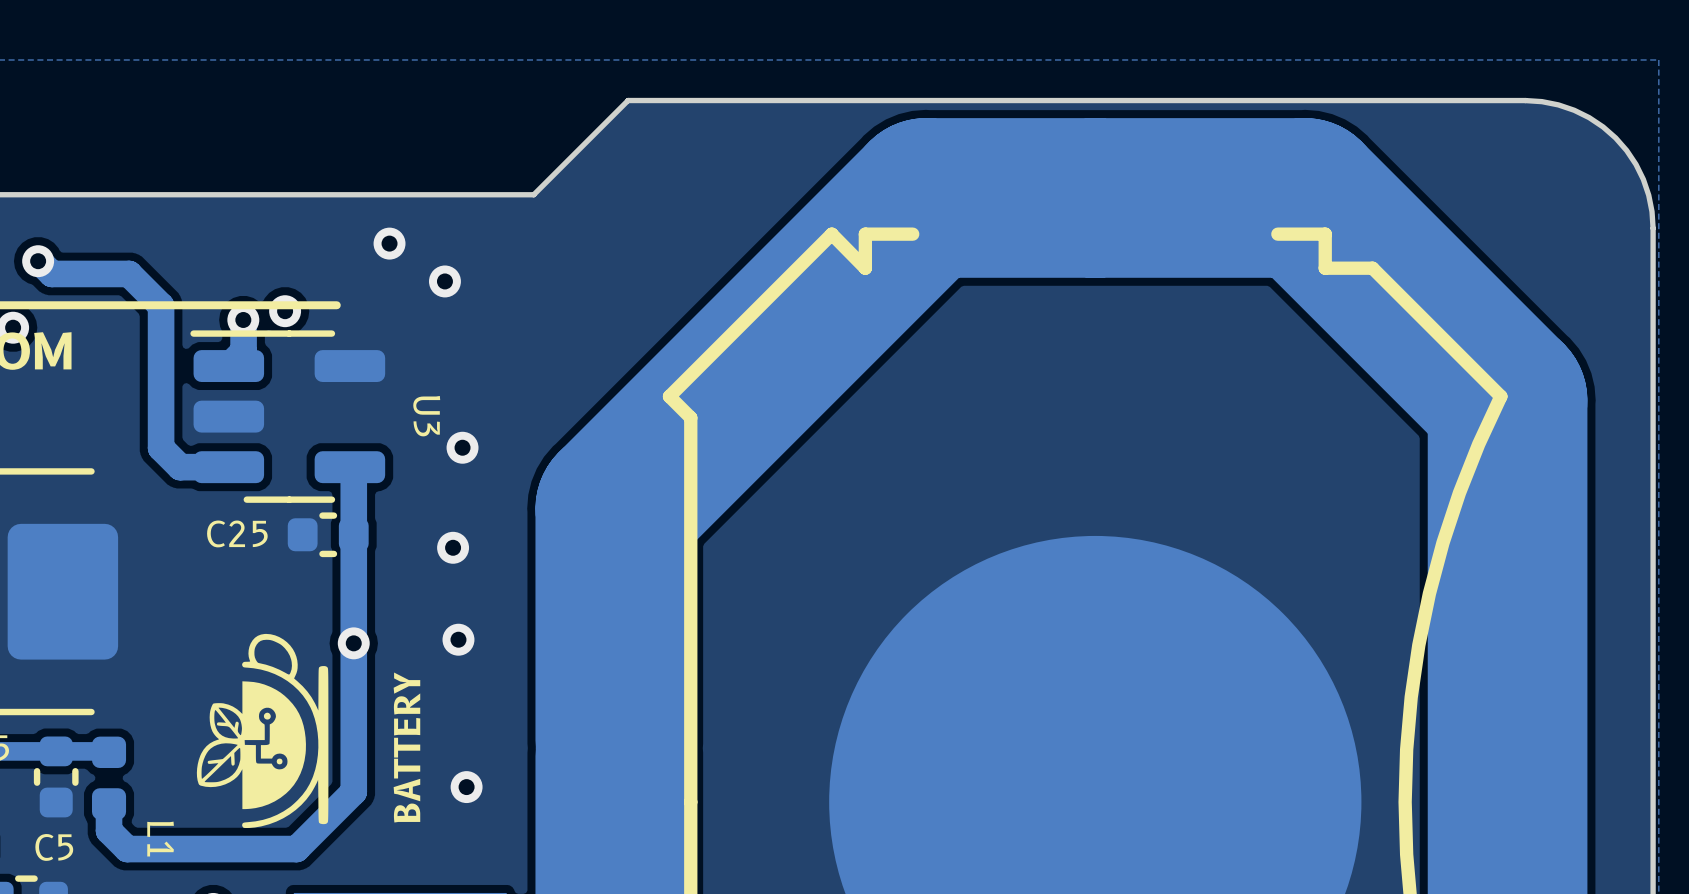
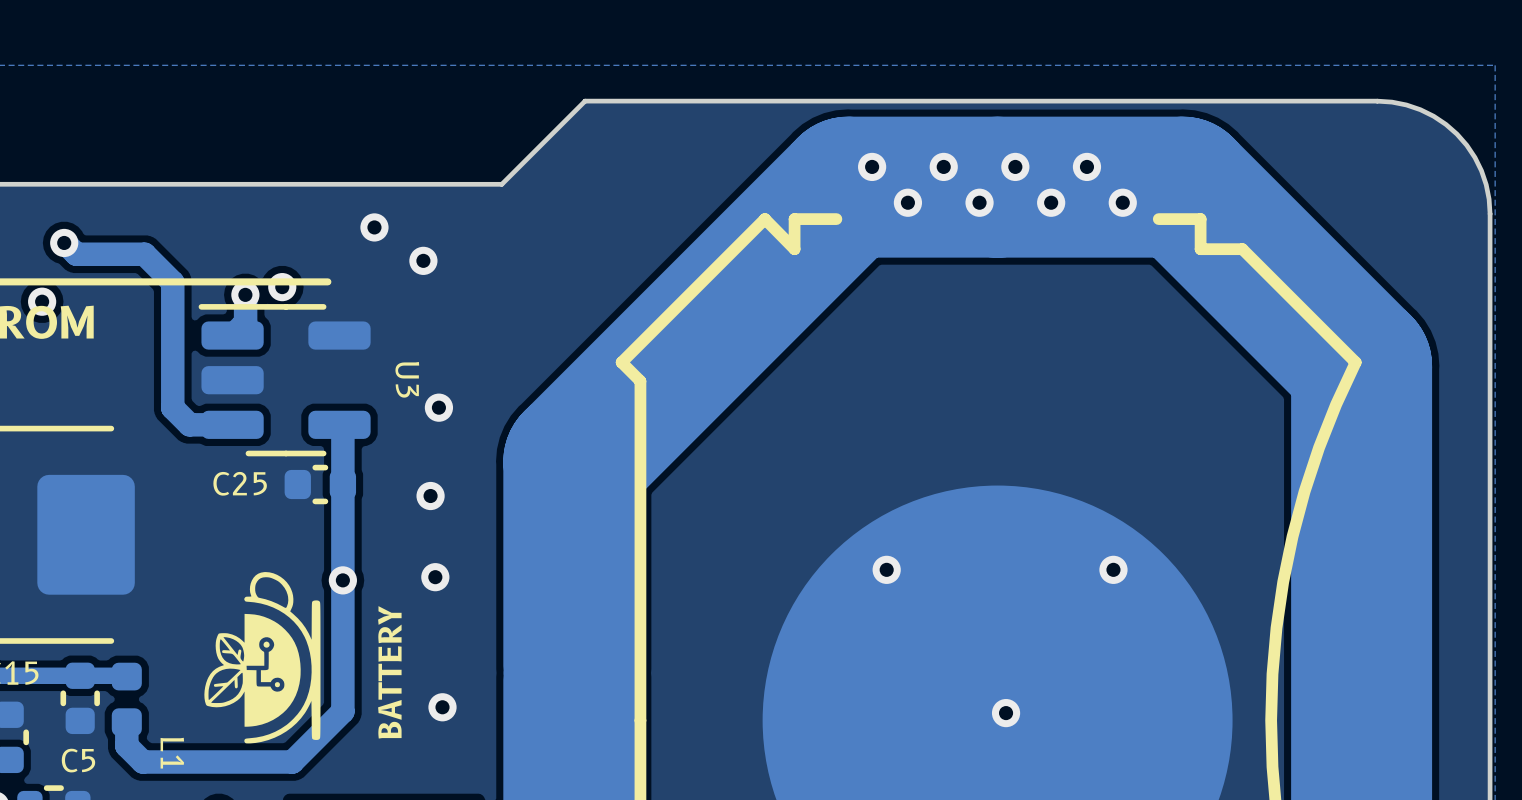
via: none -> (872, 166)
via: none -> (943, 166)
via: none -> (1015, 166)
via: none -> (1086, 166)
via: none -> (907, 202)
via: none -> (979, 202)
via: none -> (1051, 202)
via: none -> (1122, 202)
via: none -> (886, 569)
via: none -> (1113, 569)
via: none -> (1006, 713)

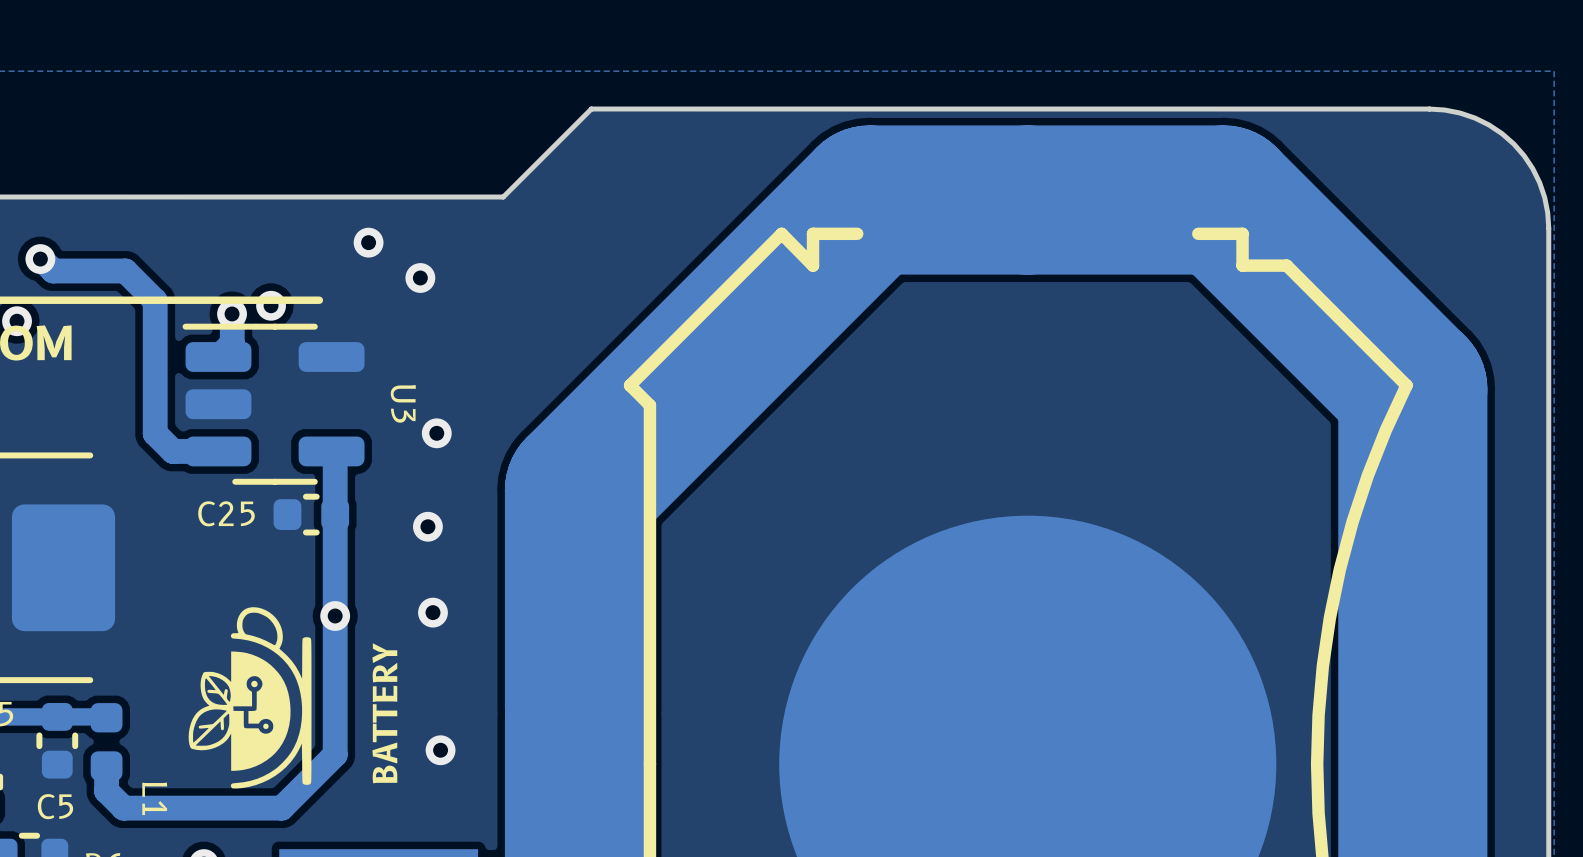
via: (872, 166) -> none
via: (943, 166) -> none
via: (1015, 166) -> none
via: (1086, 166) -> none
via: (907, 202) -> none
via: (979, 202) -> none
via: (1051, 202) -> none
via: (1122, 202) -> none
via: (886, 569) -> none
via: (1113, 569) -> none
via: (1006, 713) -> none

